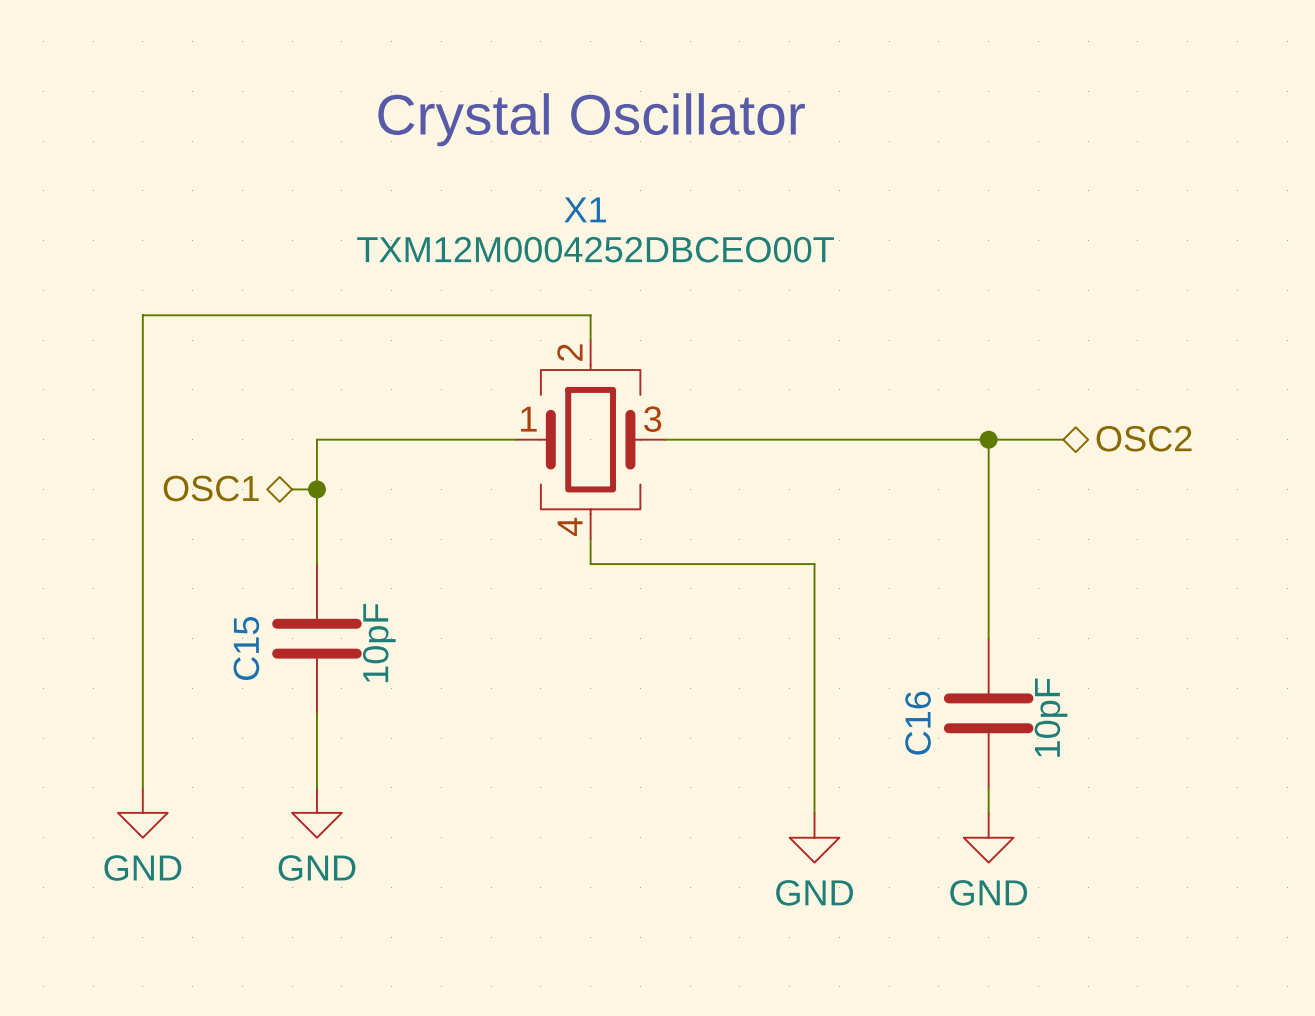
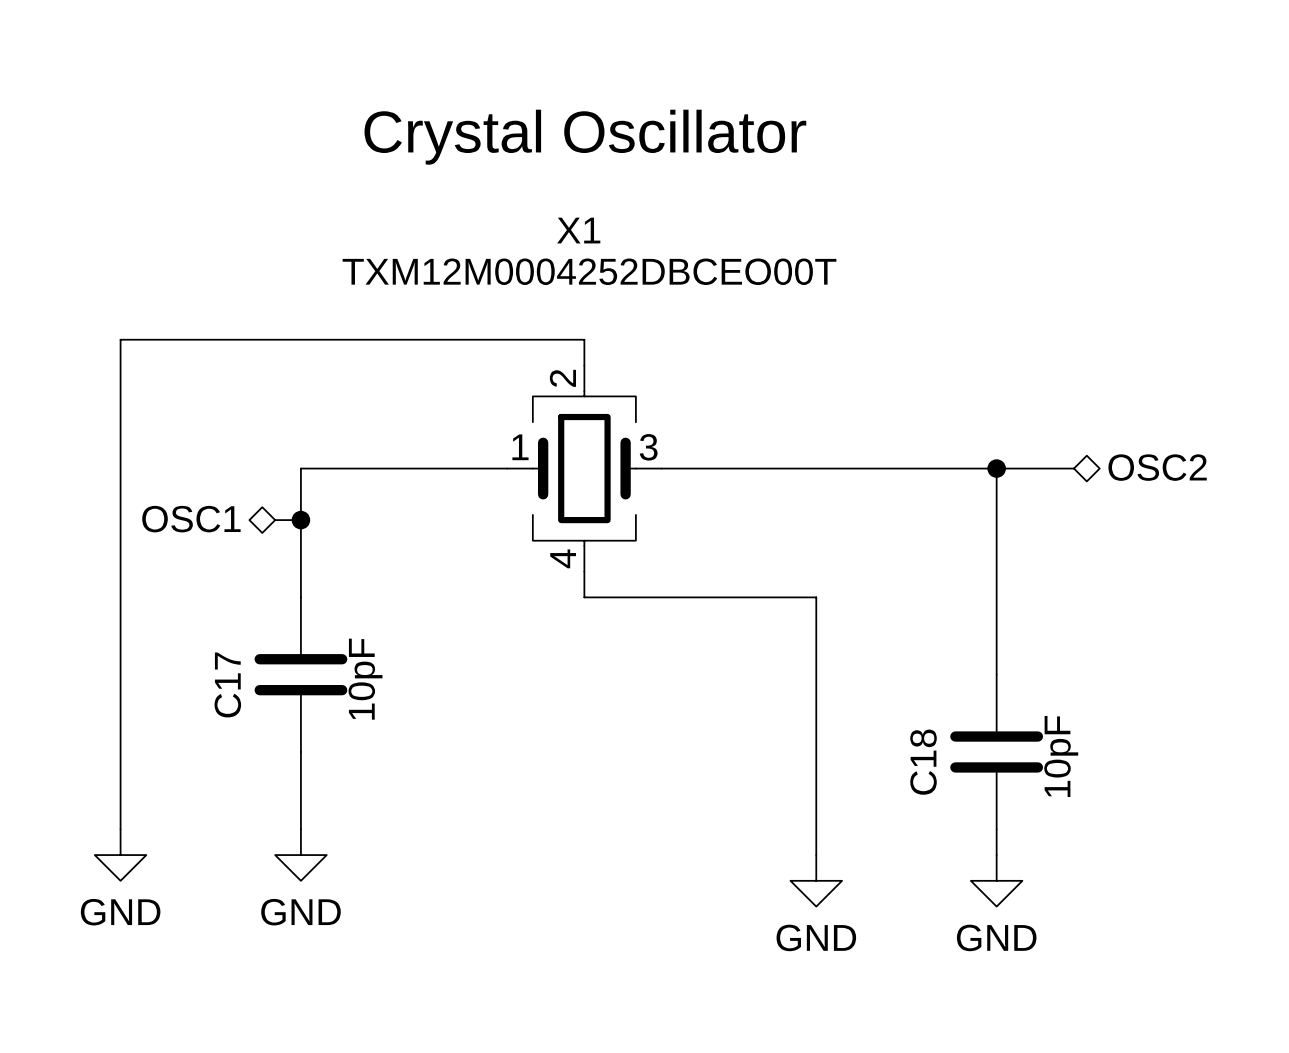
C15 name: C15 (246, 648) -> C17 (227, 684)
C16 name: C16 (918, 723) -> C18 (923, 762)

